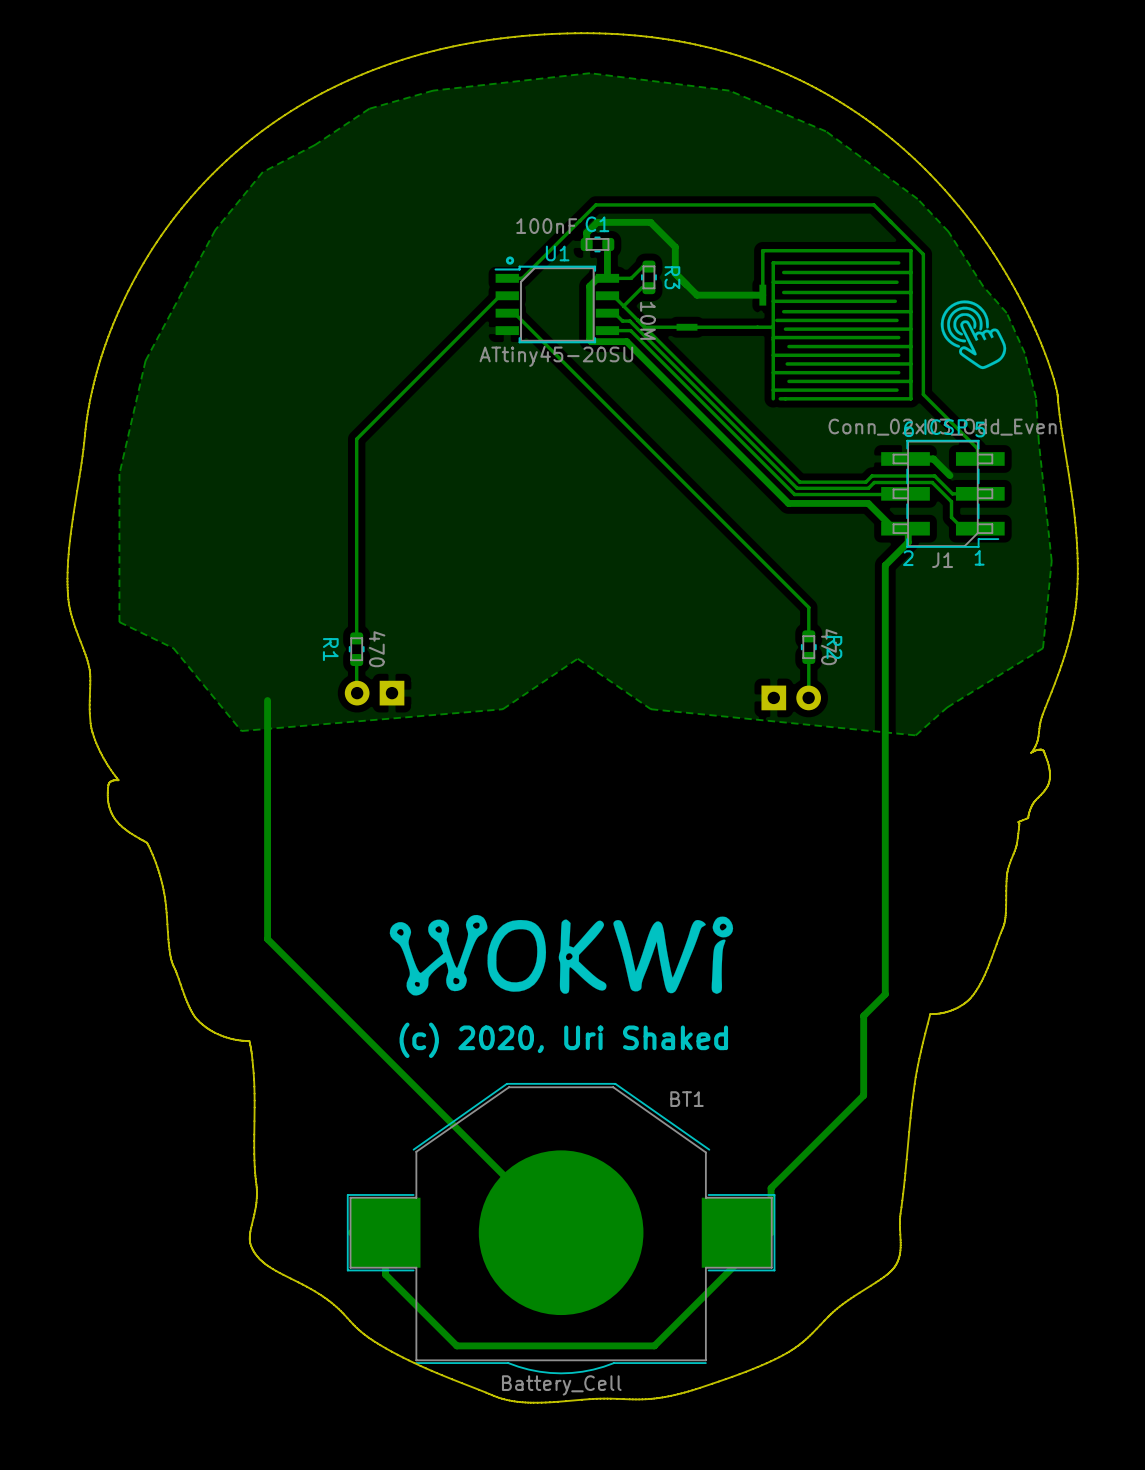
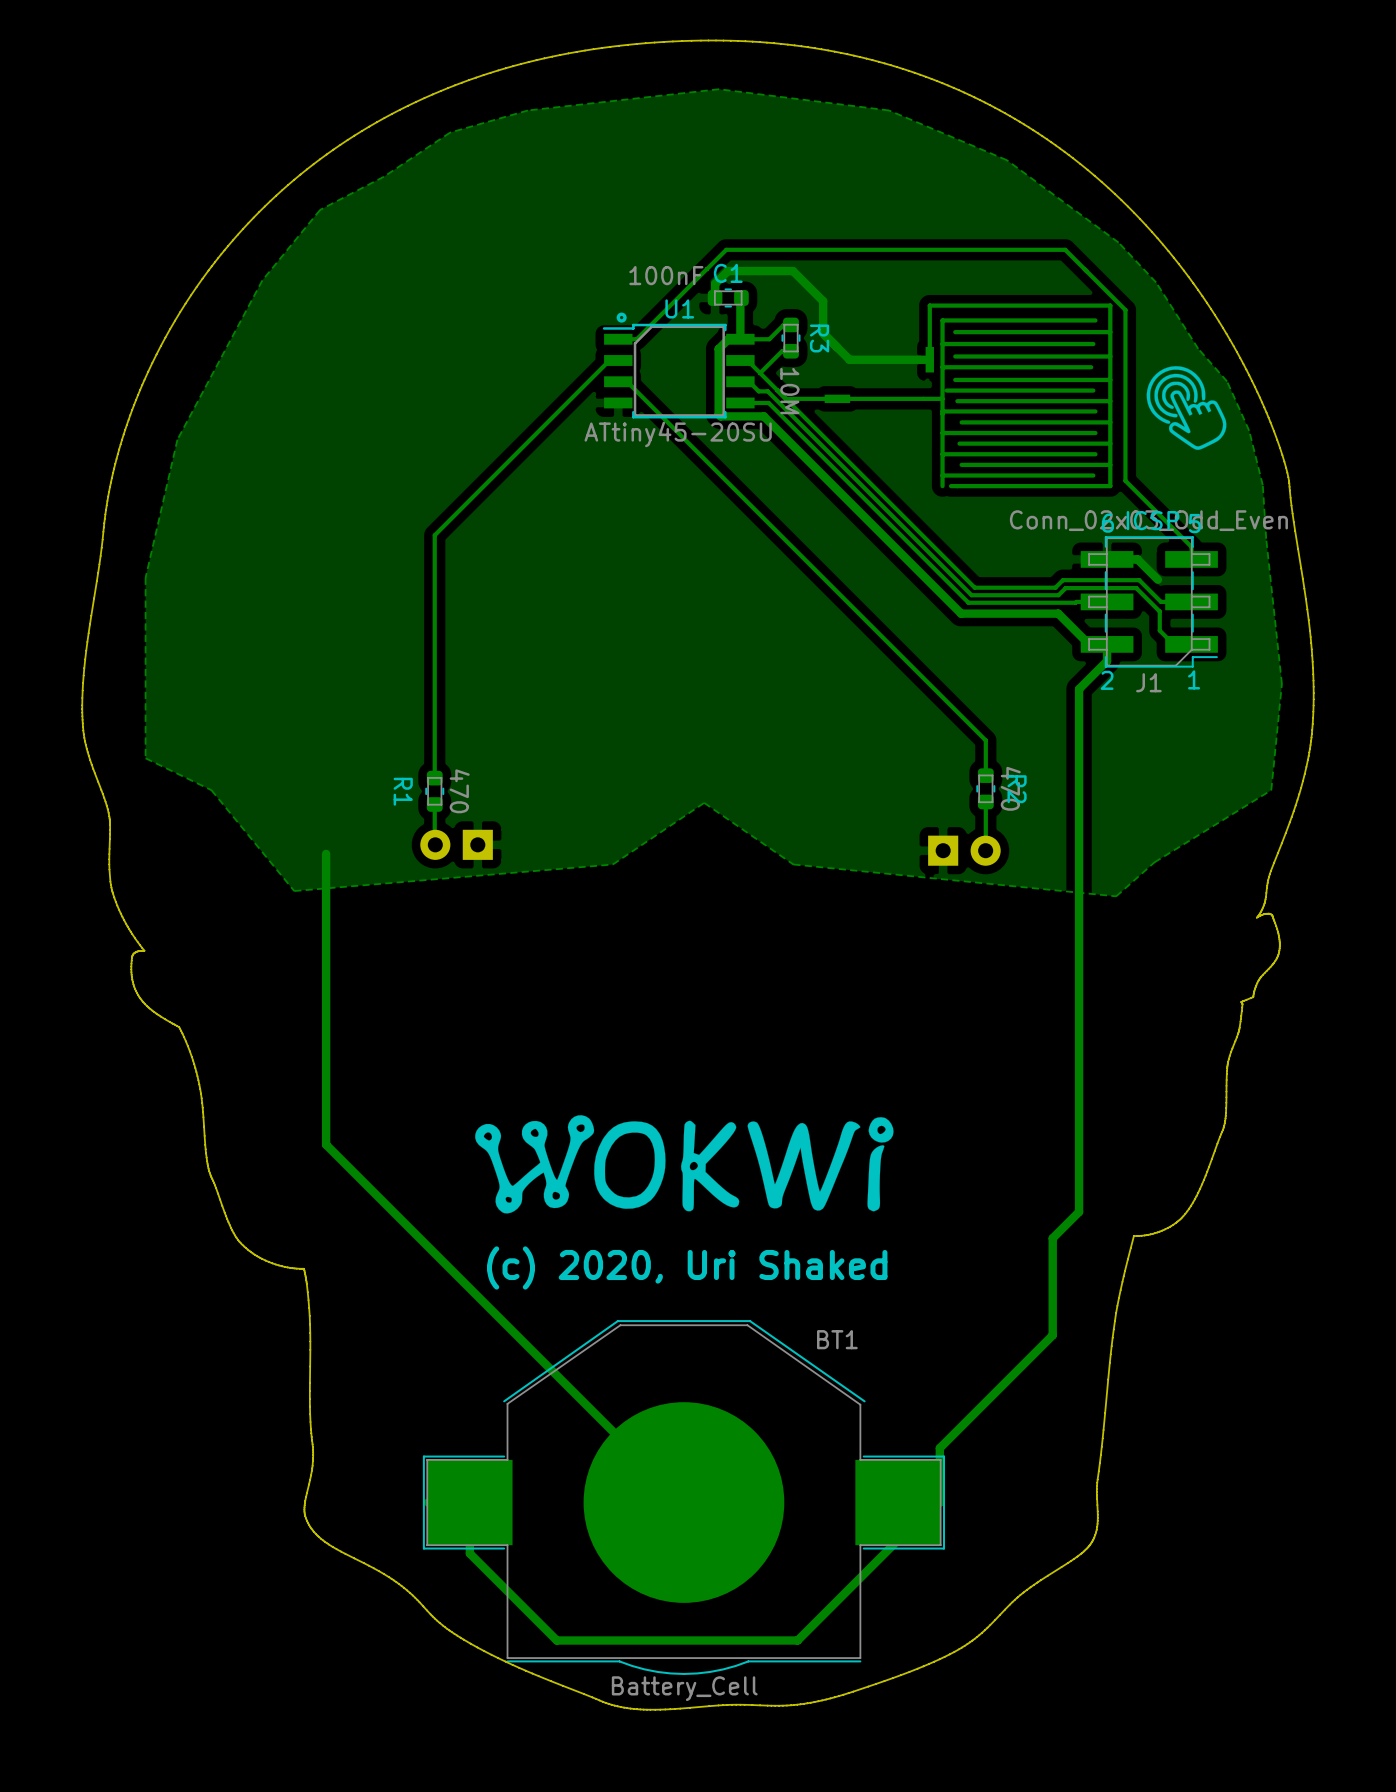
J1 footprint: [881, 439, 1005, 548] -> [1080, 536, 1218, 668]

